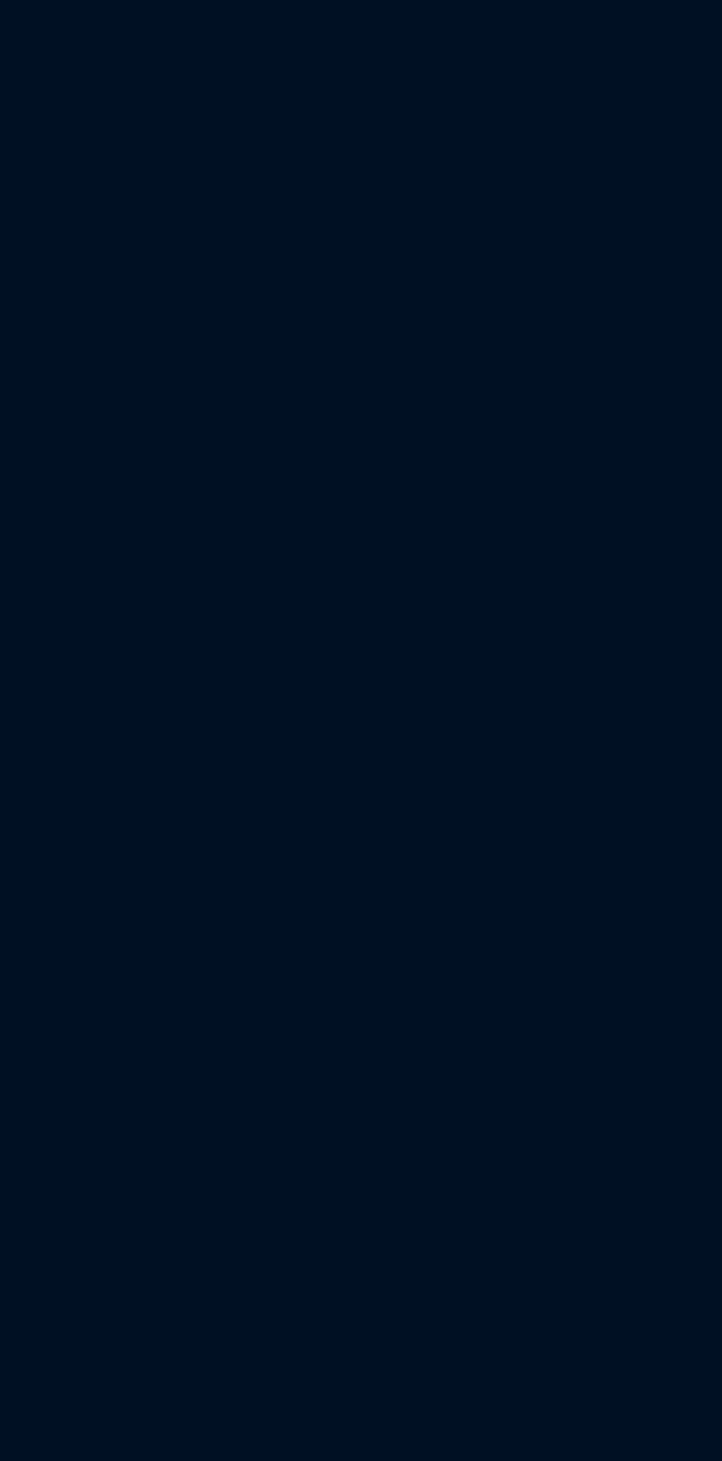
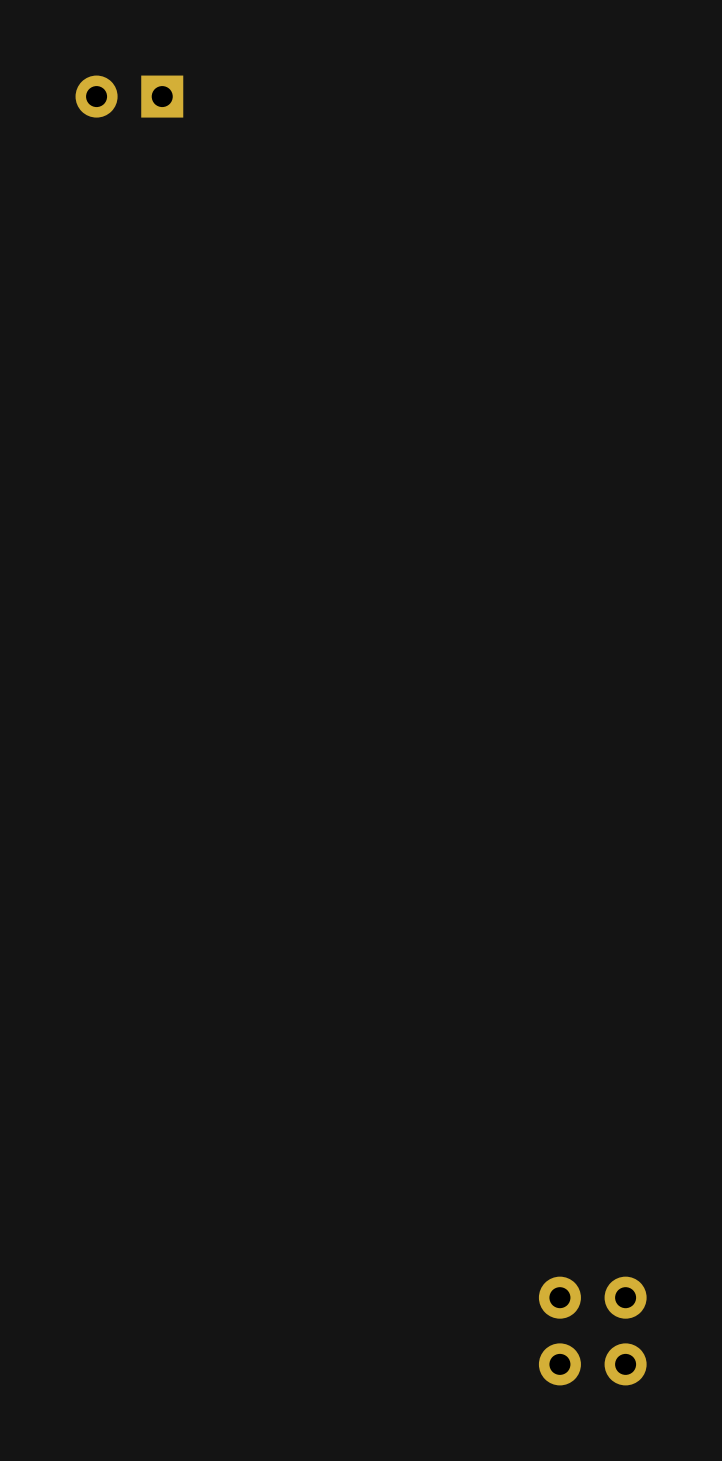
part: none -> (129, 96)
part: none -> (592, 1297)
part: none -> (592, 1364)

